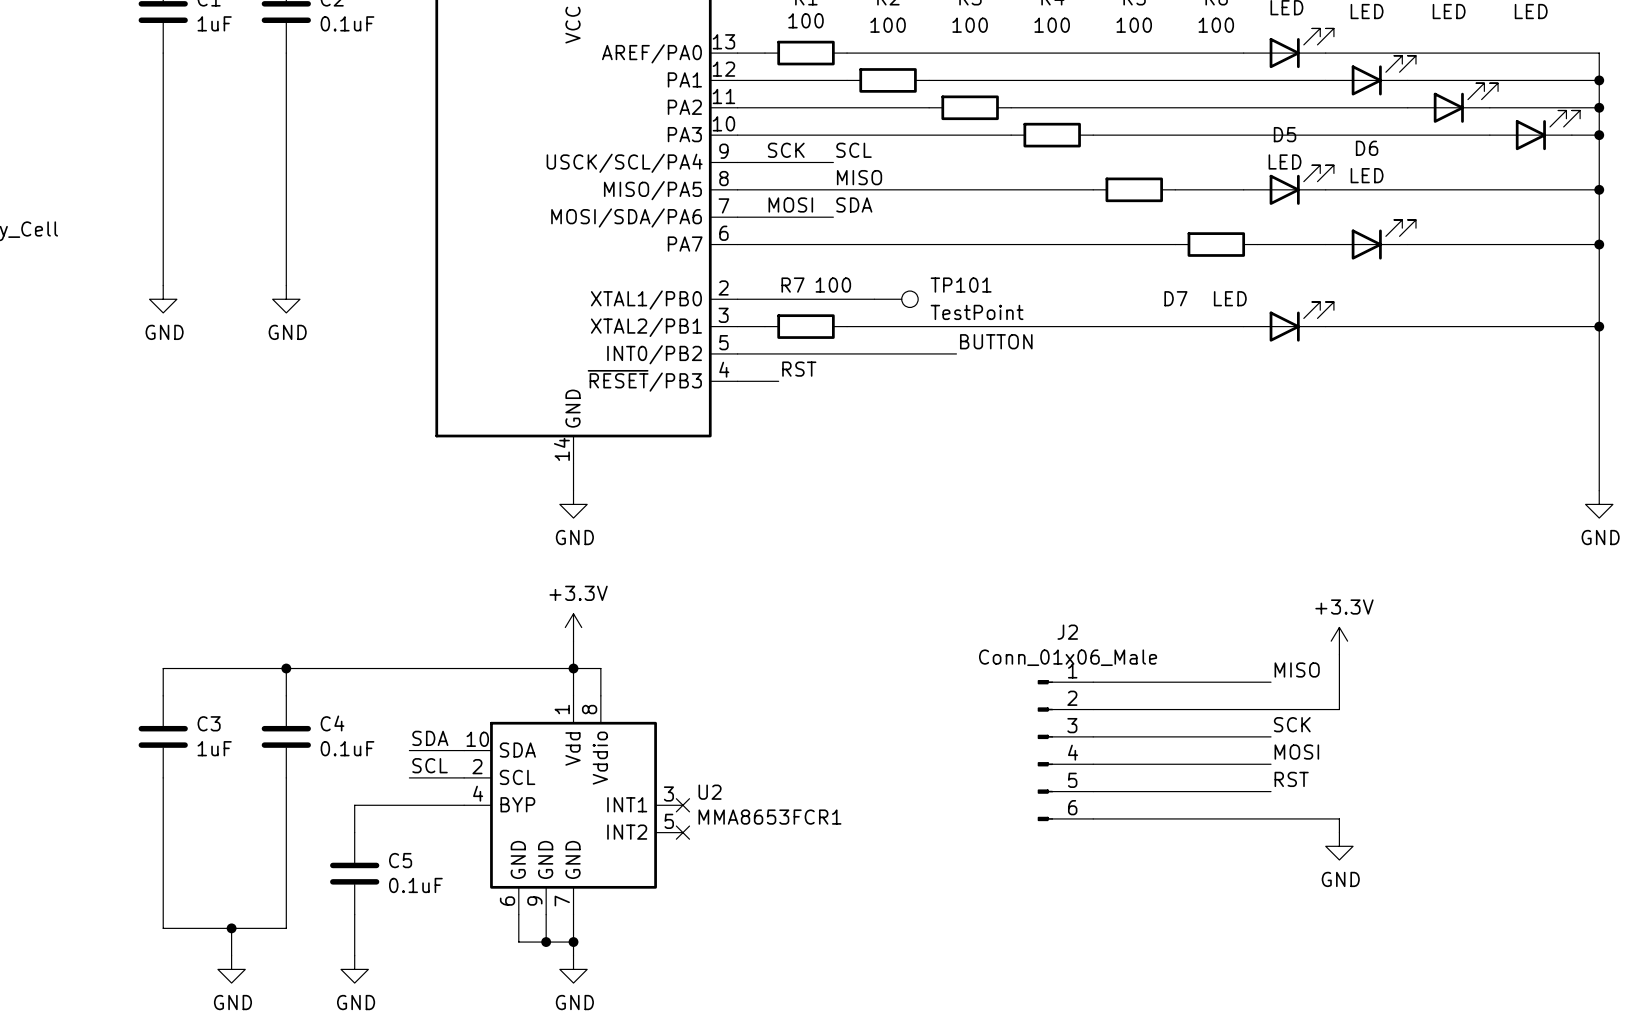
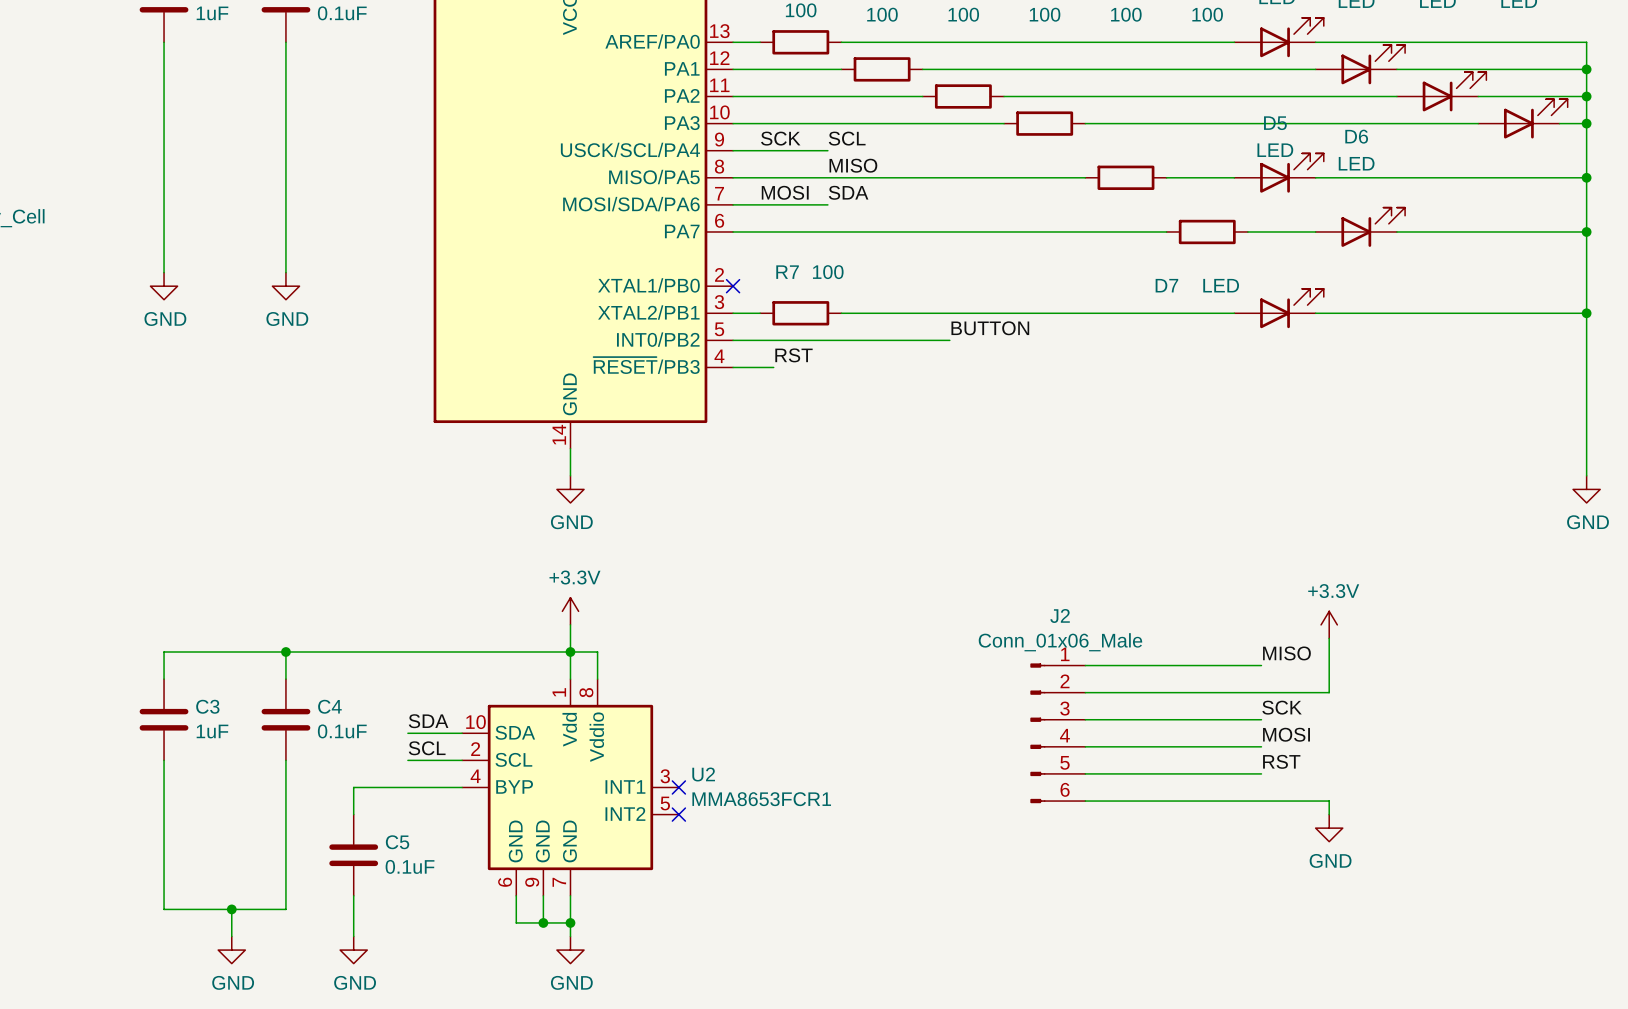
wire: (737, 299) (874, 299) -> none
no-connect mark: none -> (733, 286)
TP101: TestPoint (896, 299) -> none

